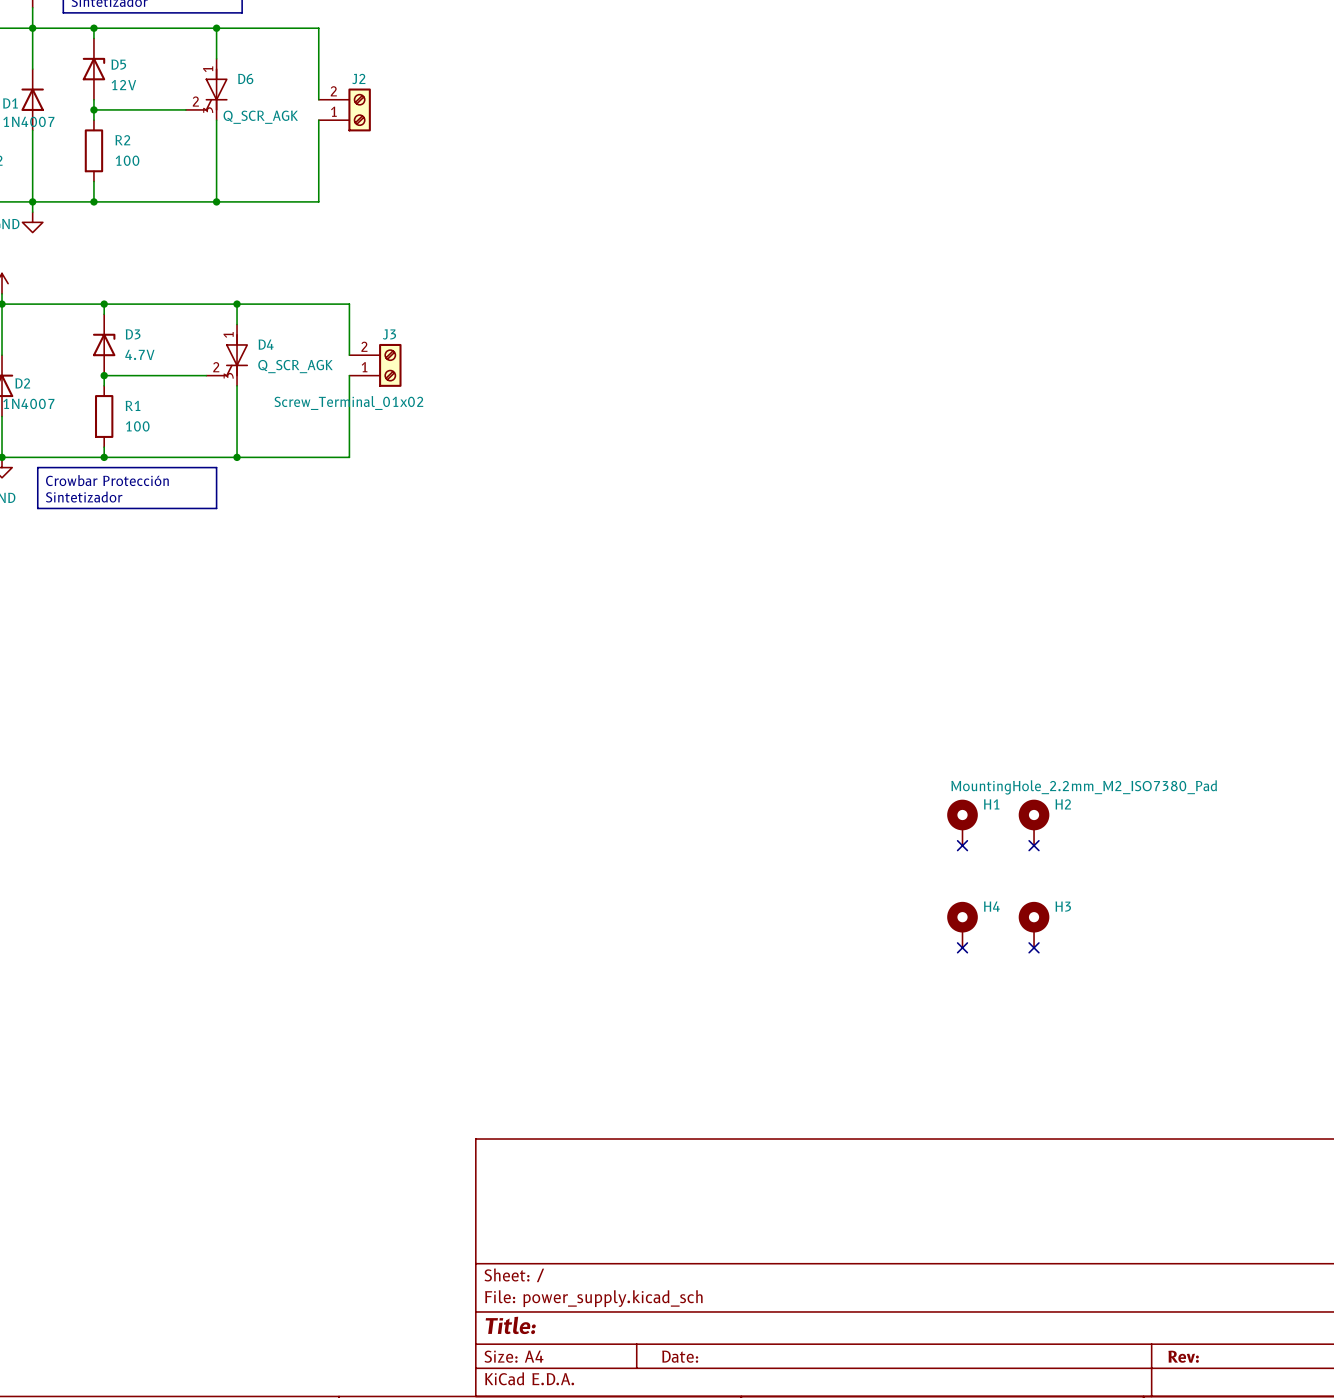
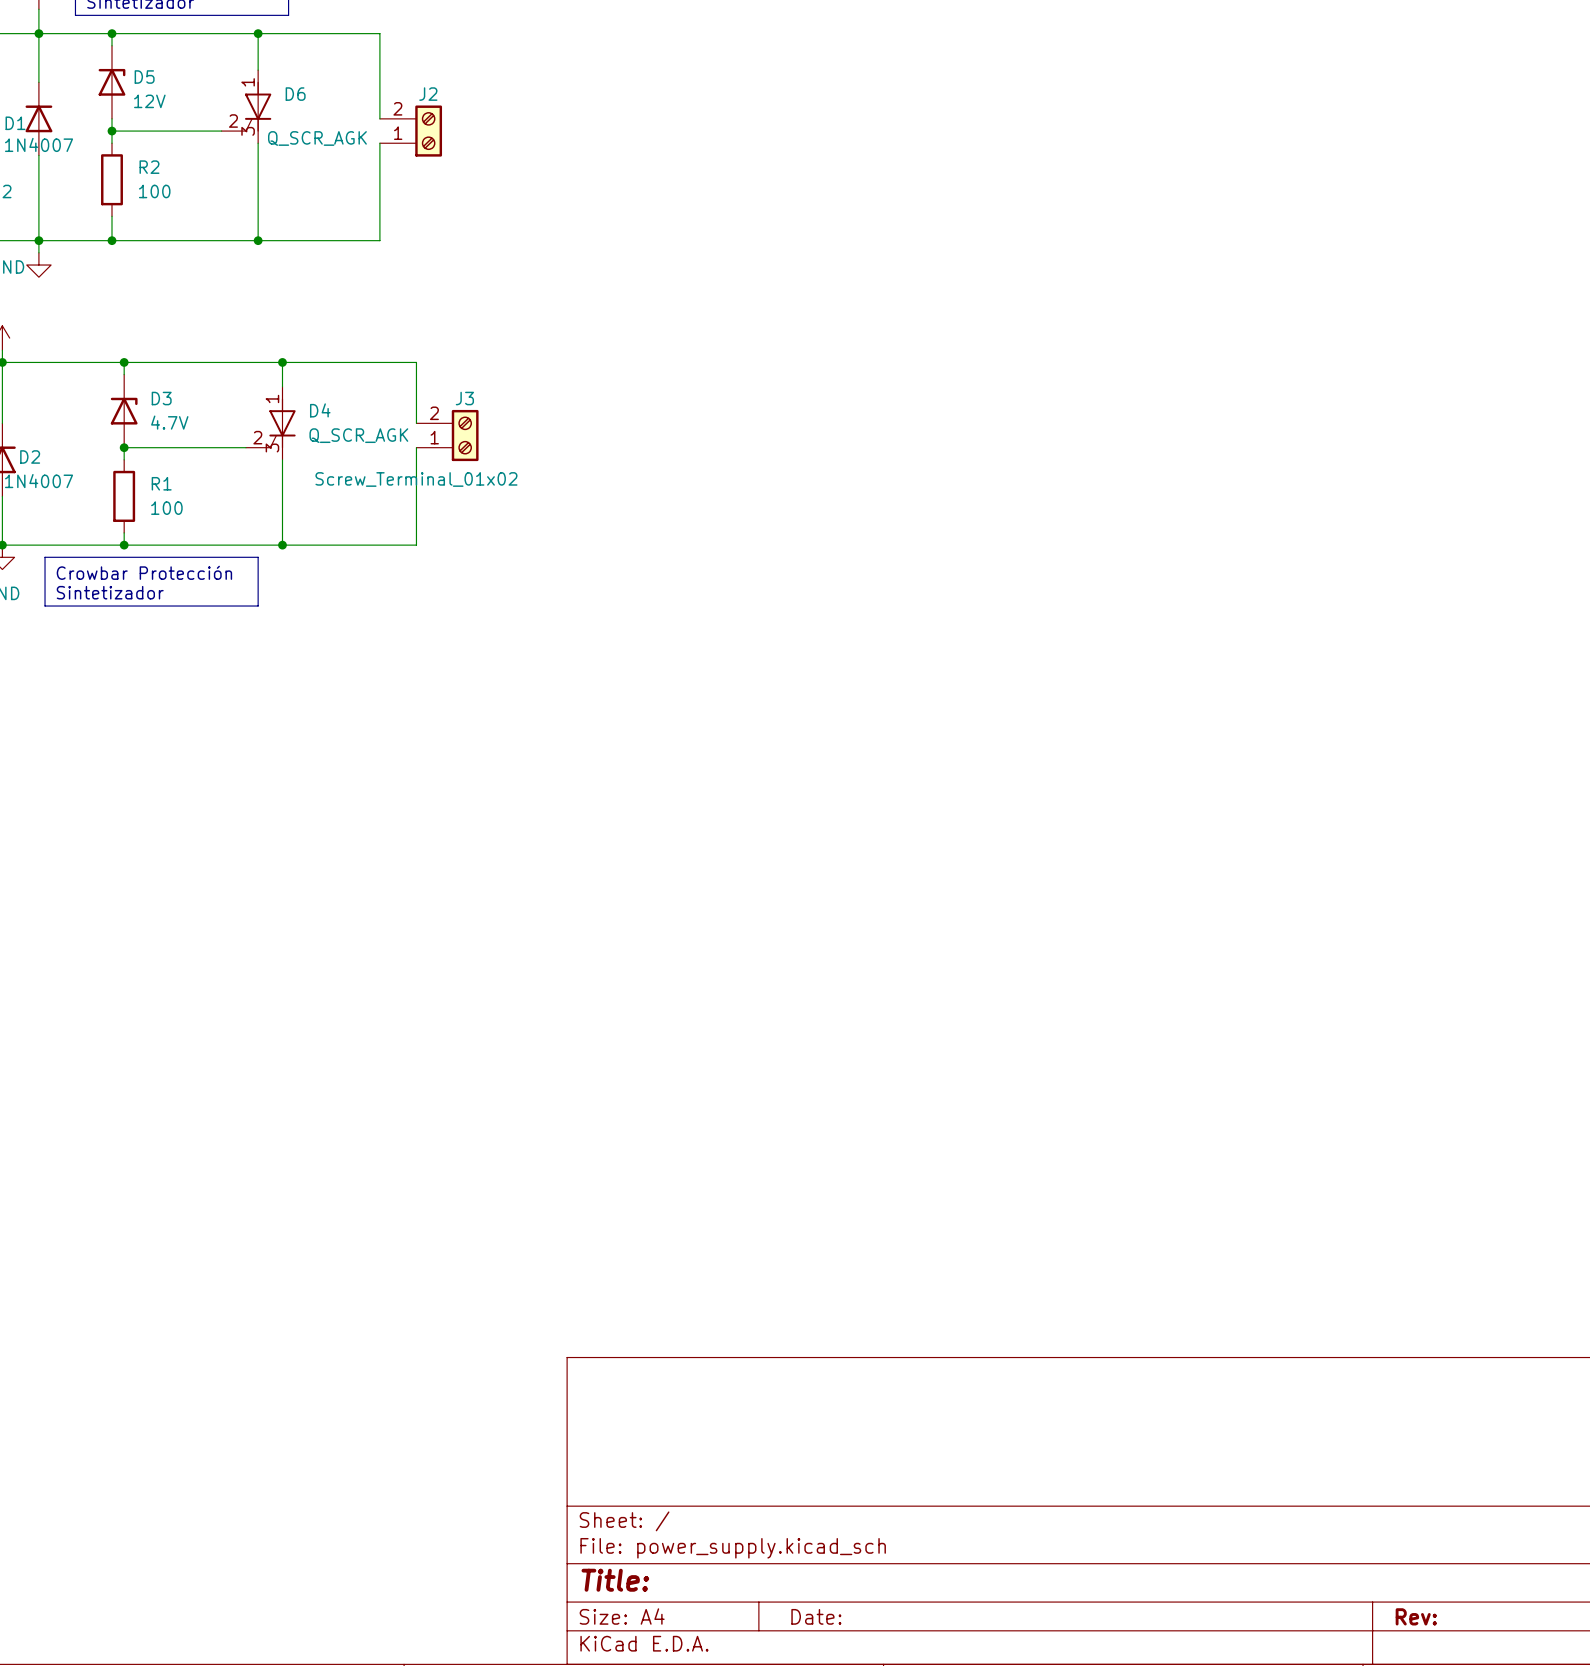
H1: (962, 822) -> none
H2: MountingHole_2.2mm_M2_ISO7380_Pad (1034, 822) -> none
no-connect mark: (962, 845) -> none
no-connect mark: (1034, 845) -> none
H4: (962, 924) -> none
H3: (1034, 924) -> none
no-connect mark: (962, 947) -> none
no-connect mark: (1034, 947) -> none

